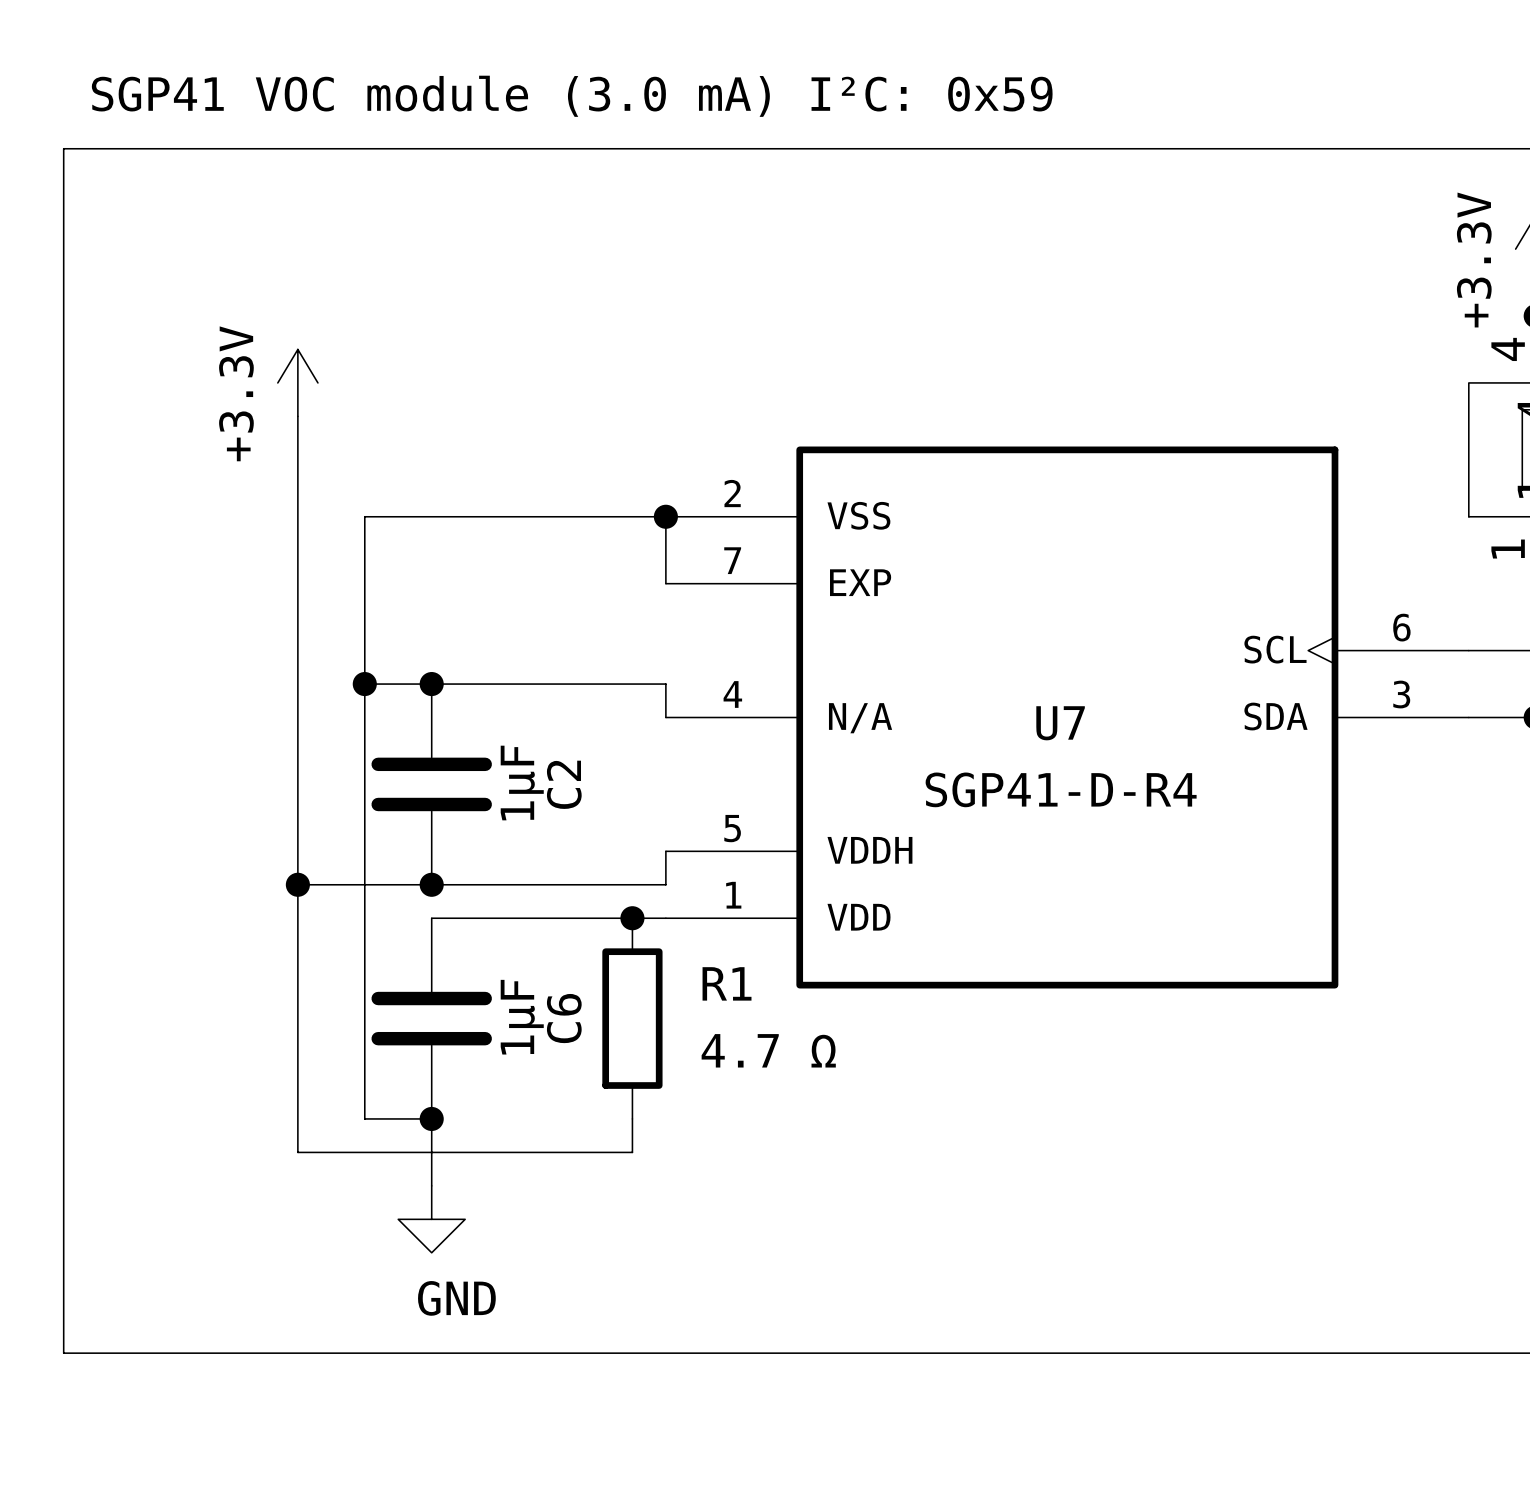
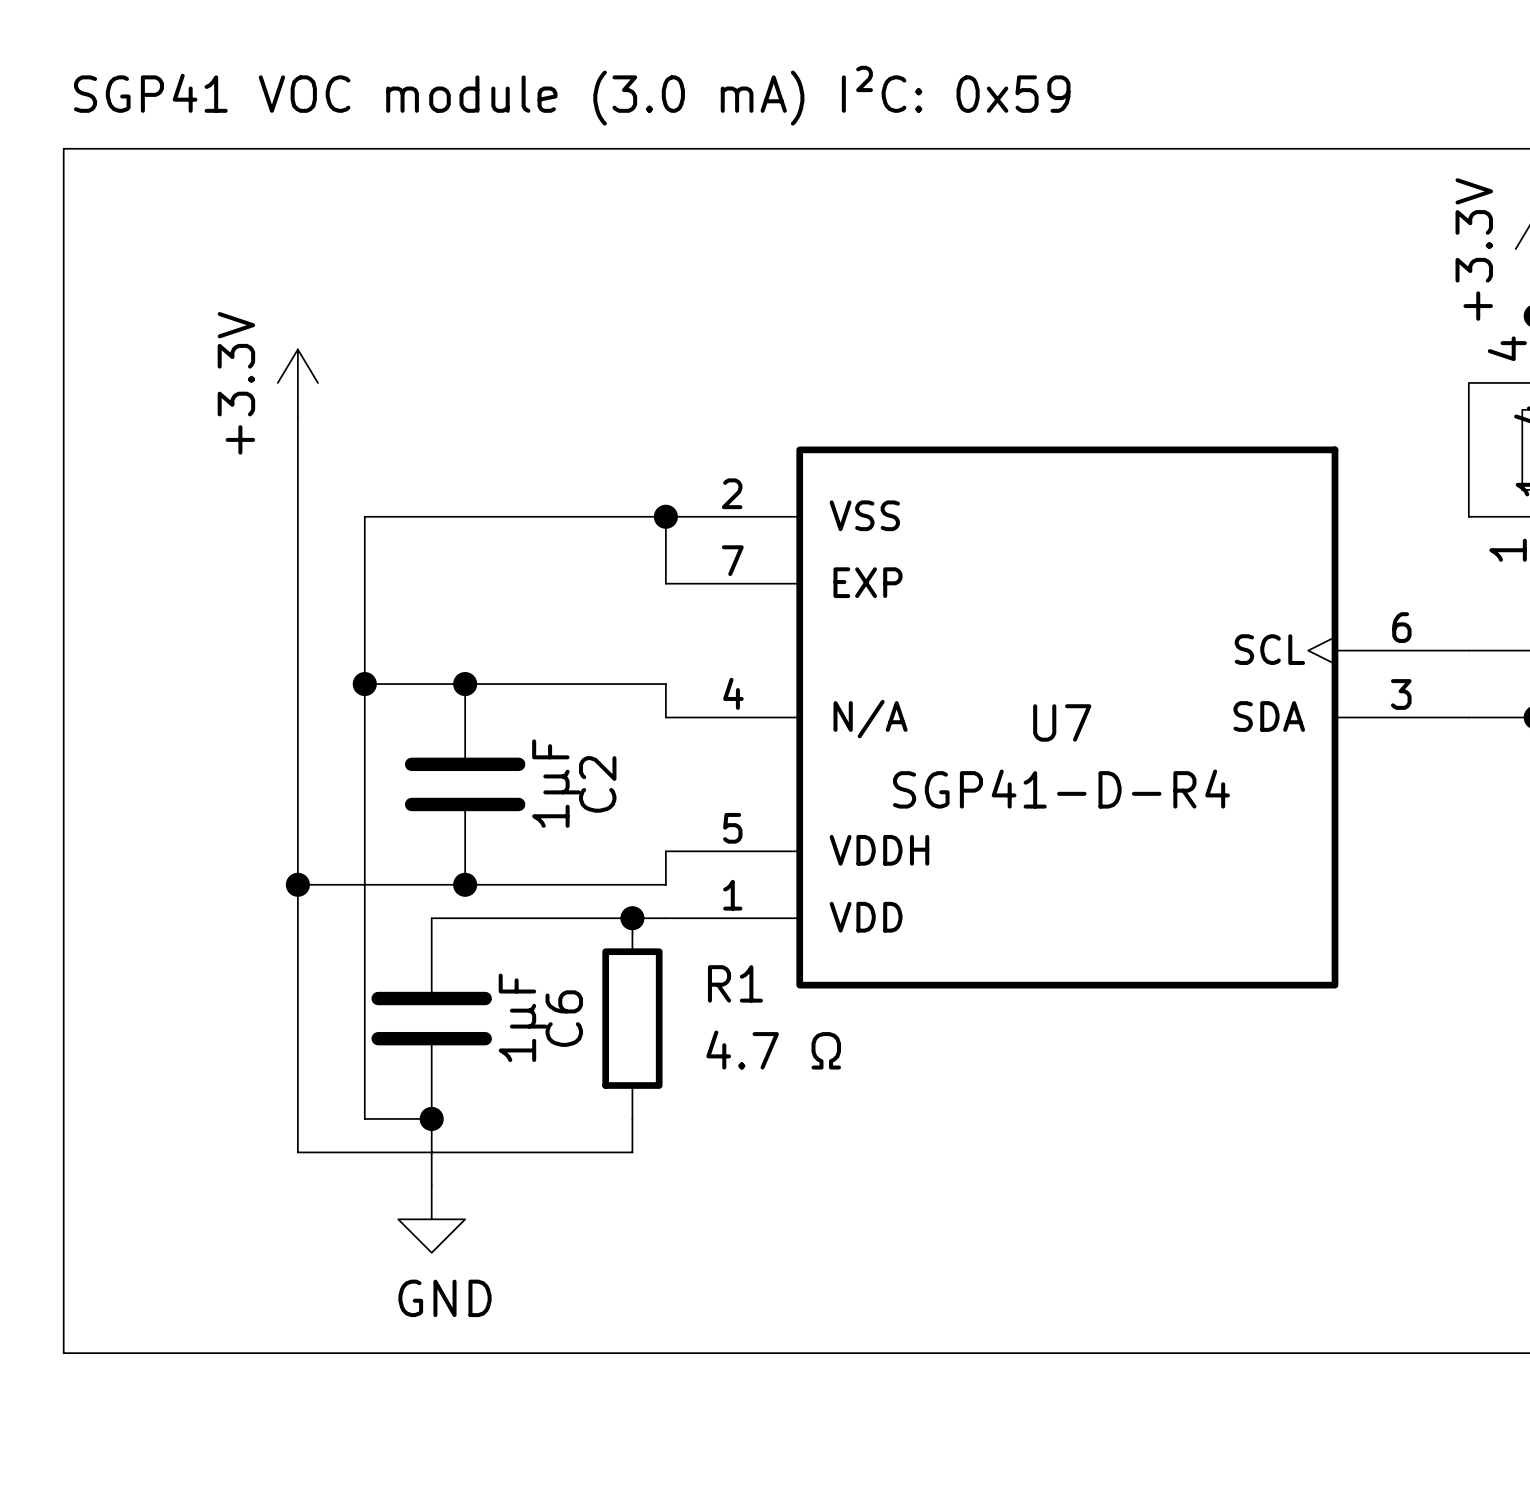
junction position: (431, 684) -> (465, 684)
C2 position: (431, 784) -> (465, 784)
junction position: (431, 884) -> (465, 884)

